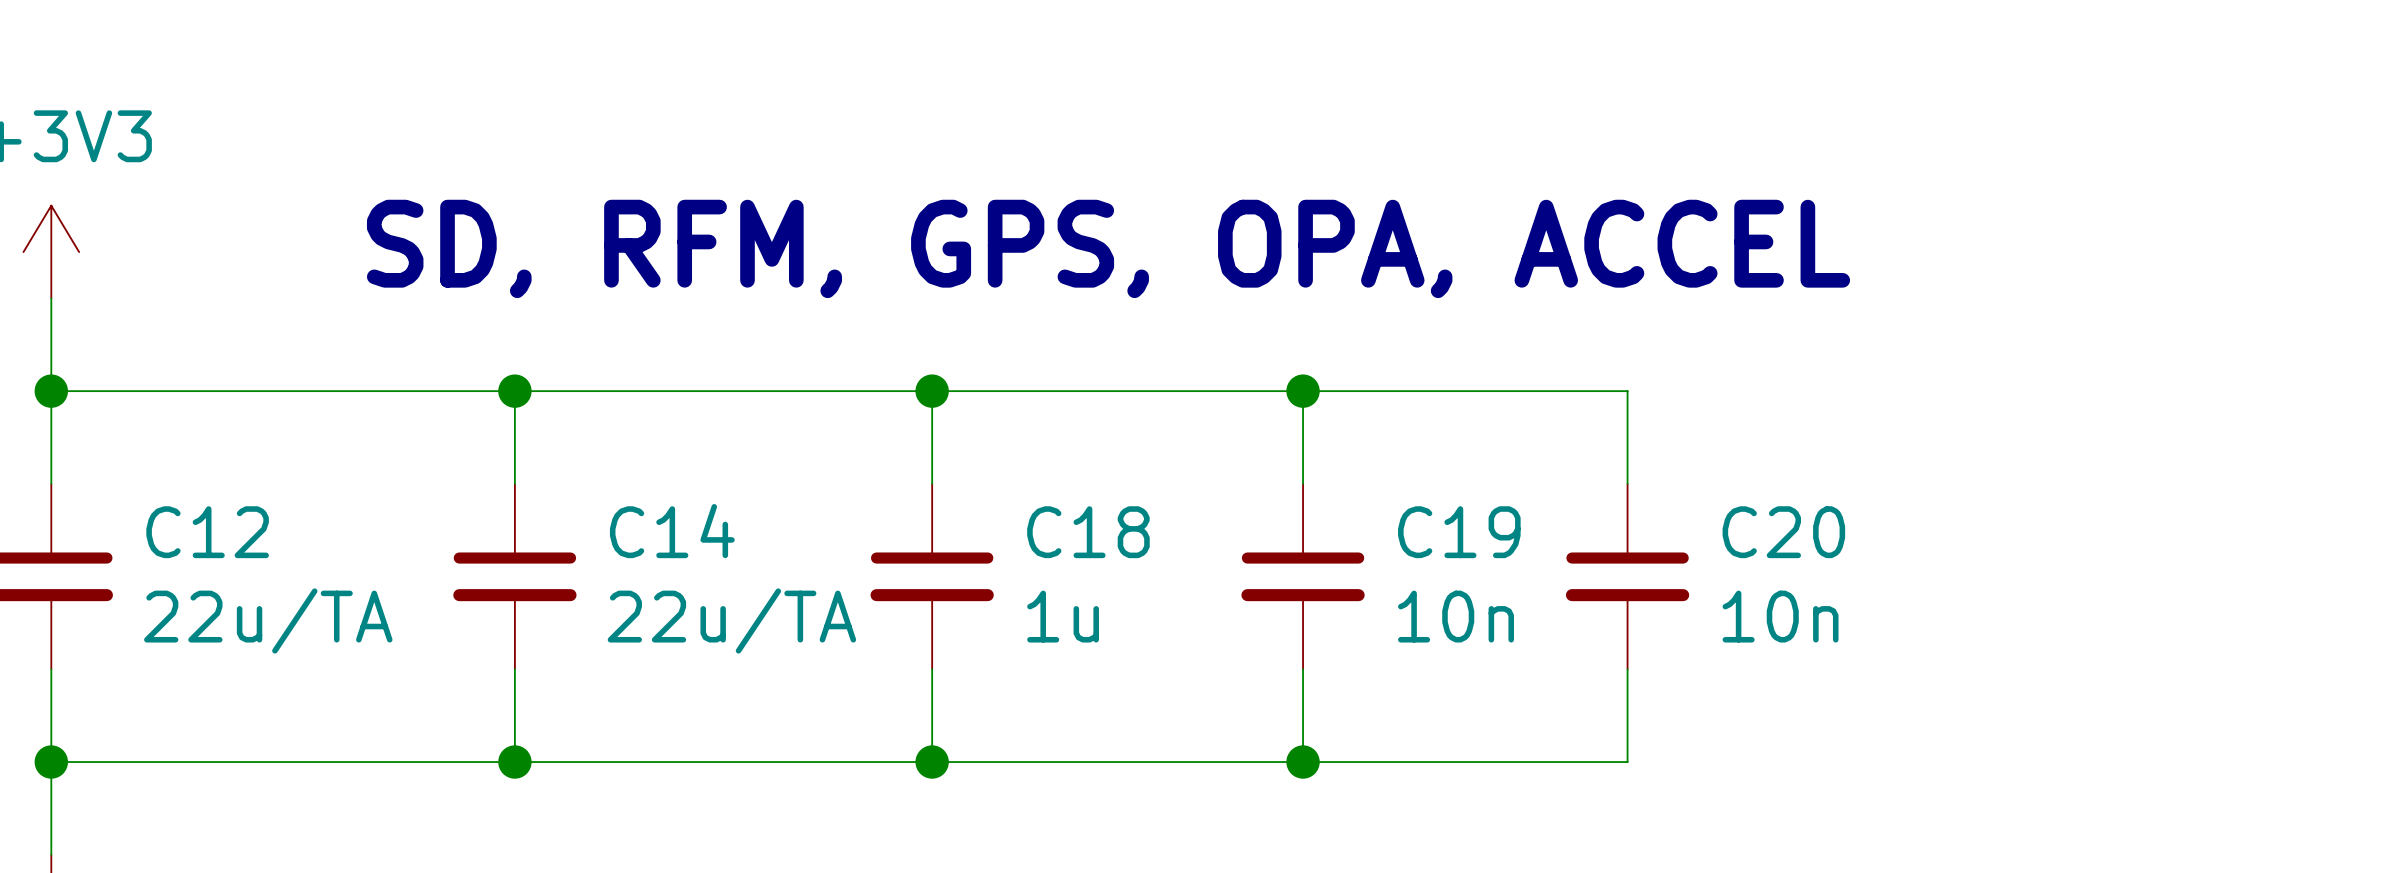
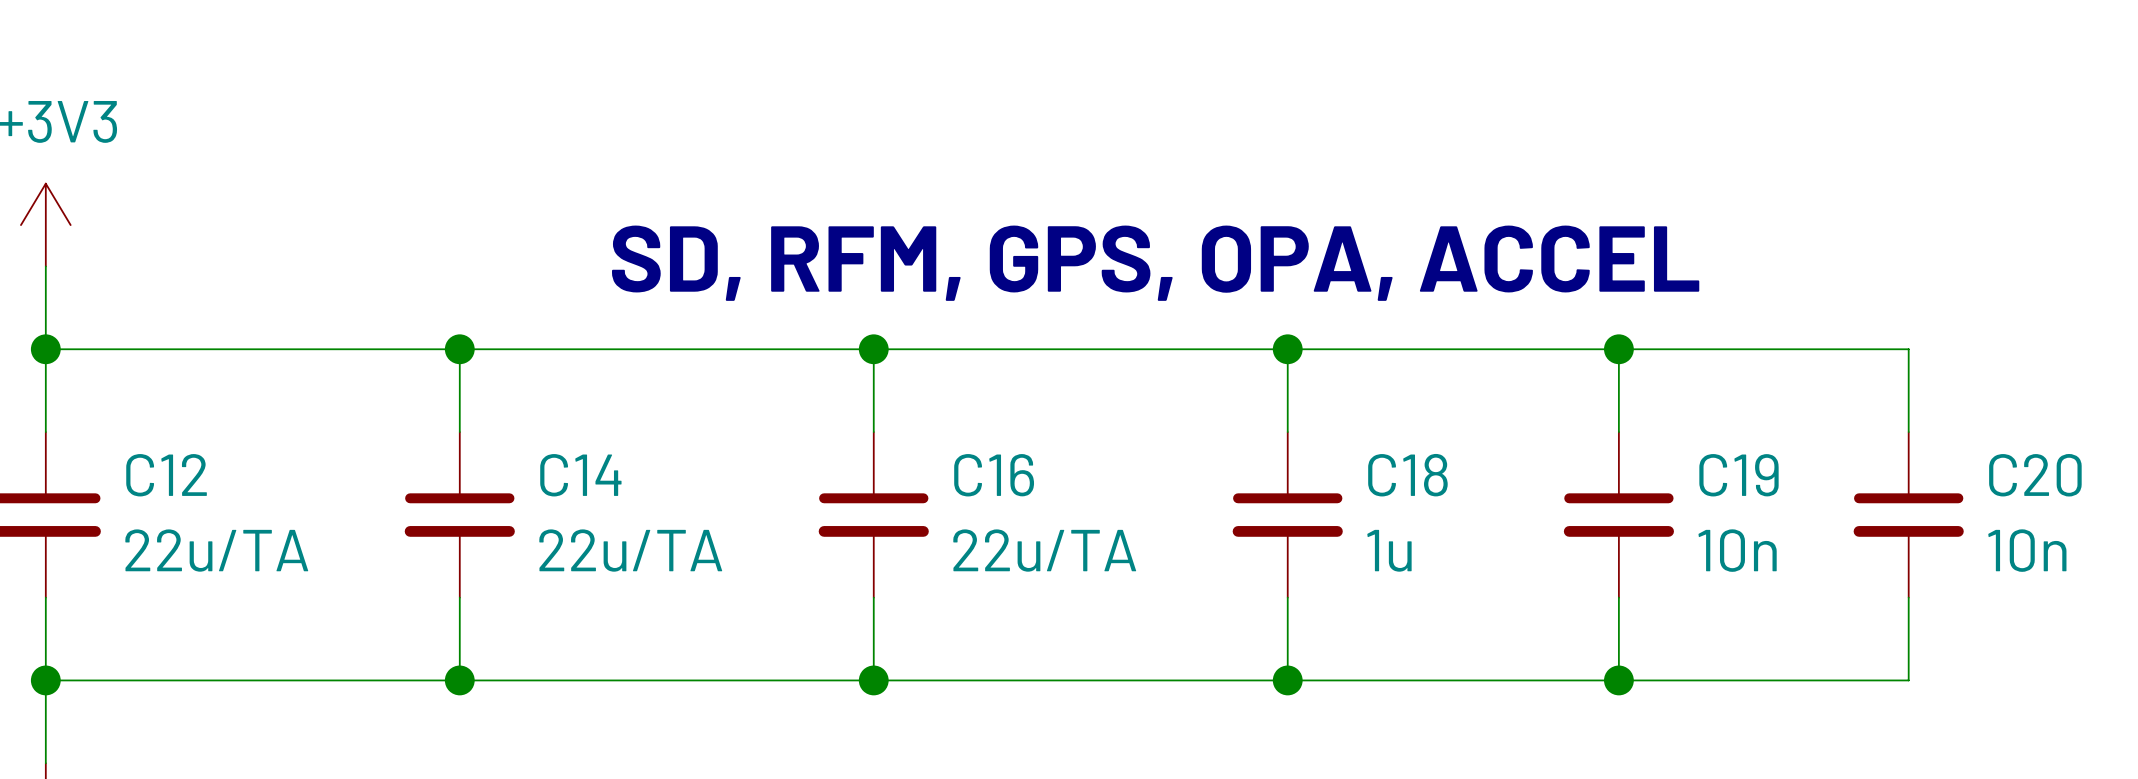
text position: SD, RFM, GPS, OPA, ACCEL (1108, 248) -> SD, RFM, GPS, OPA, ACCEL (1155, 263)
wire: (932, 391) (932, 483) -> (1287, 349) (1287, 432)
junction position: (932, 391) -> (873, 349)
wire: none -> (873, 349) (873, 432)
wire: (1303, 391) (1303, 483) -> (1618, 349) (1618, 432)
junction position: (1303, 391) -> (1287, 349)
wire: (1627, 391) (1627, 483) -> (1453, 349) (1908, 349) (1908, 432)
junction: none -> (1618, 349)
C18 position: (932, 576) -> (1287, 514)
C16: none -> 22u/TA (873, 514)
C19 position: (1303, 576) -> (1618, 514)
C20 position: (1627, 576) -> (1908, 514)
wire: (932, 669) (932, 762) -> (1287, 597) (1287, 680)
wire: none -> (873, 597) (873, 680)
wire: (1303, 669) (1303, 762) -> (1618, 597) (1618, 680)
wire: (1627, 669) (1627, 762) -> (1908, 597) (1908, 680) (1453, 680)
junction position: (932, 762) -> (873, 680)
junction position: (1303, 762) -> (1287, 680)
junction: none -> (1618, 680)

